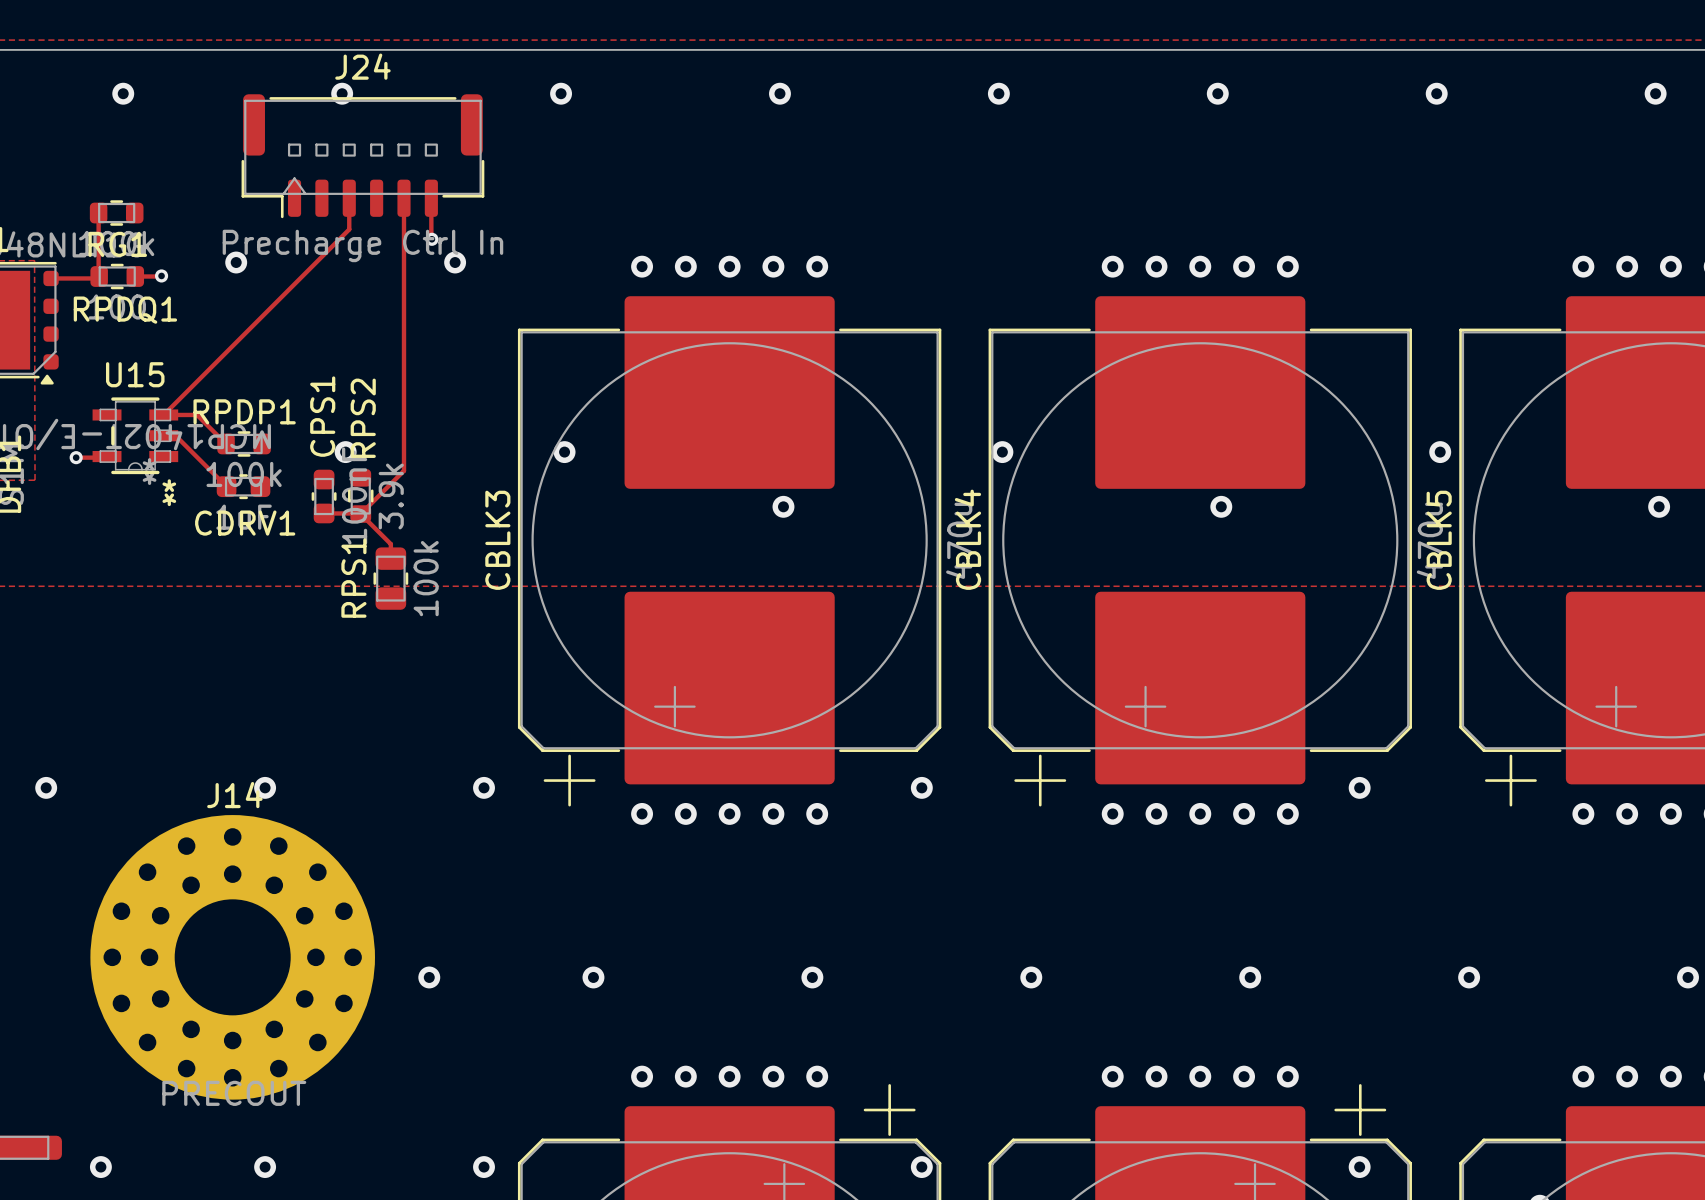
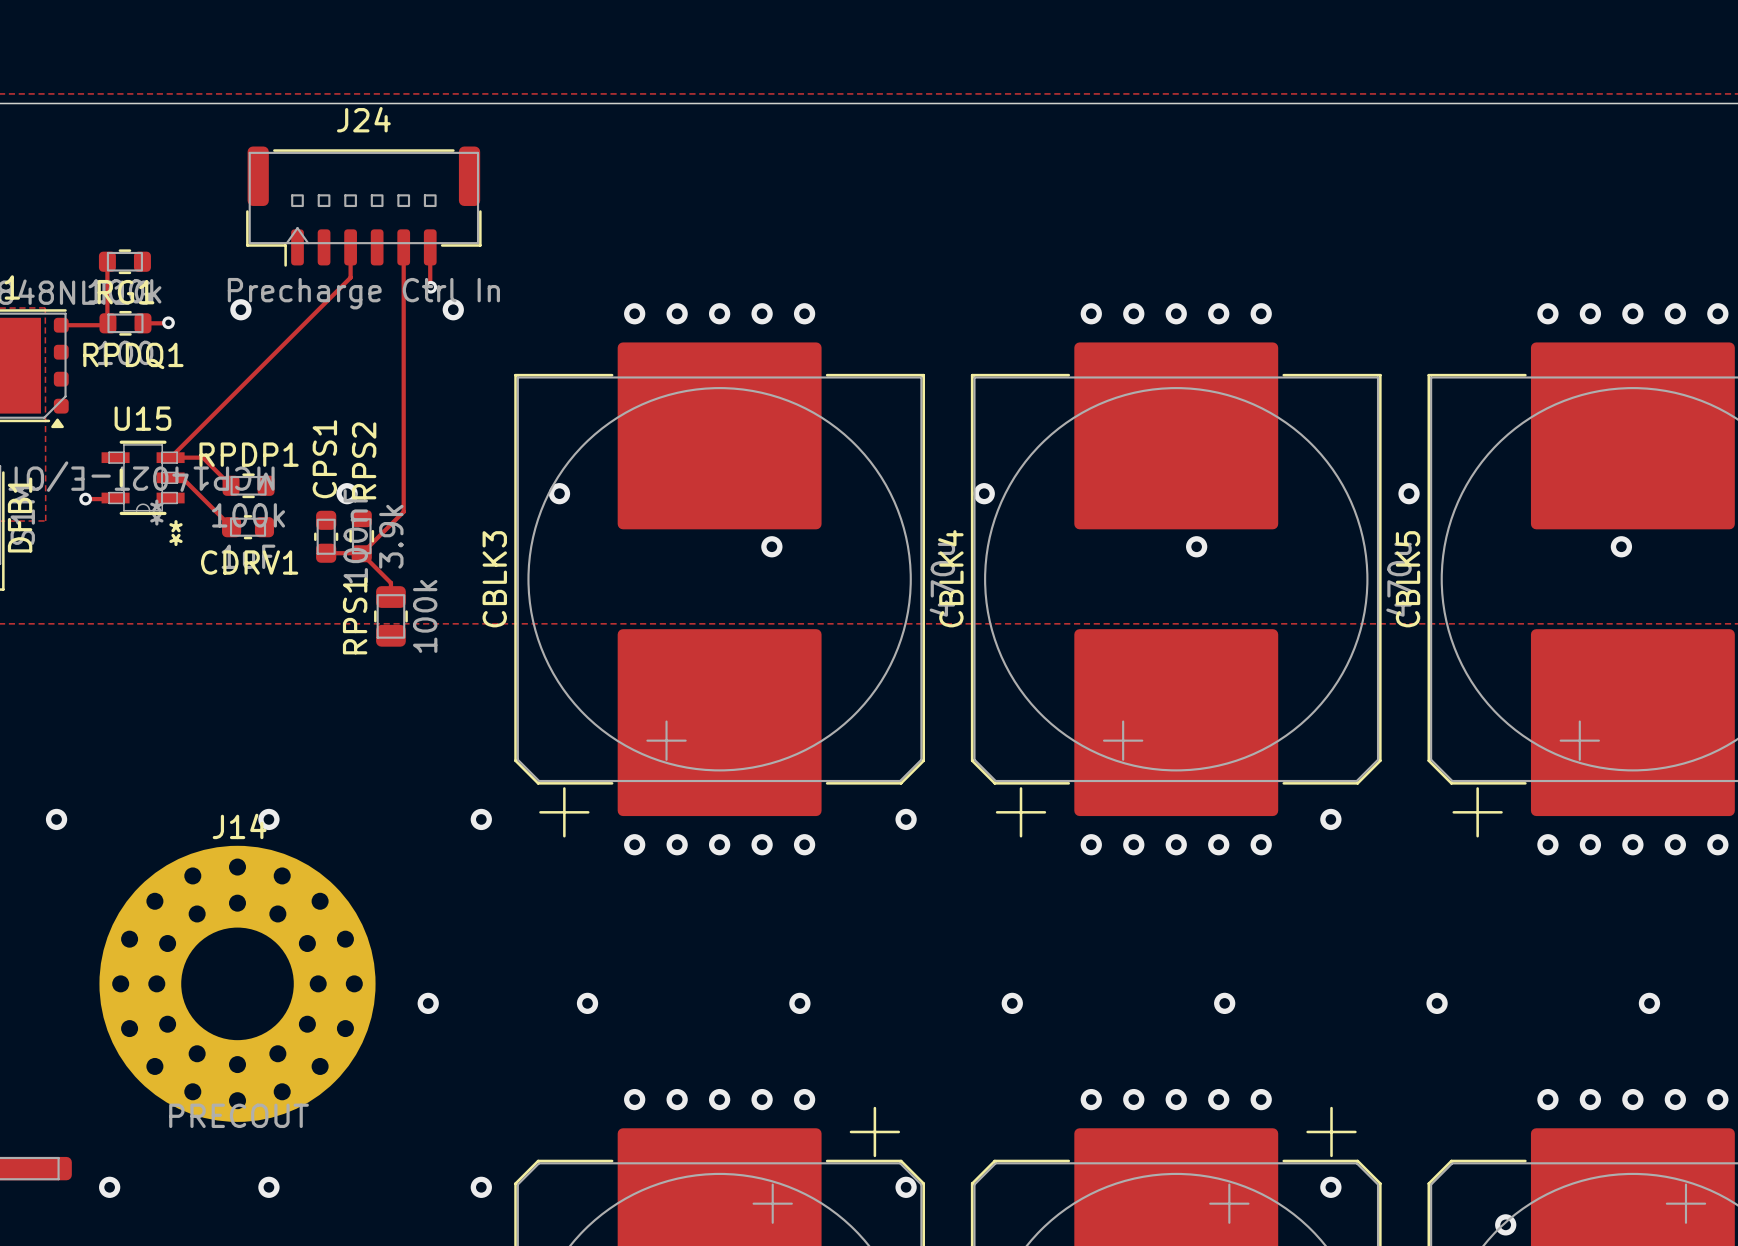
via: (123, 93) -> none
via: (342, 93) -> none
via: (561, 93) -> none
via: (779, 93) -> none
via: (998, 93) -> none
via: (1217, 93) -> none
via: (1436, 93) -> none
via: (1655, 93) -> none

